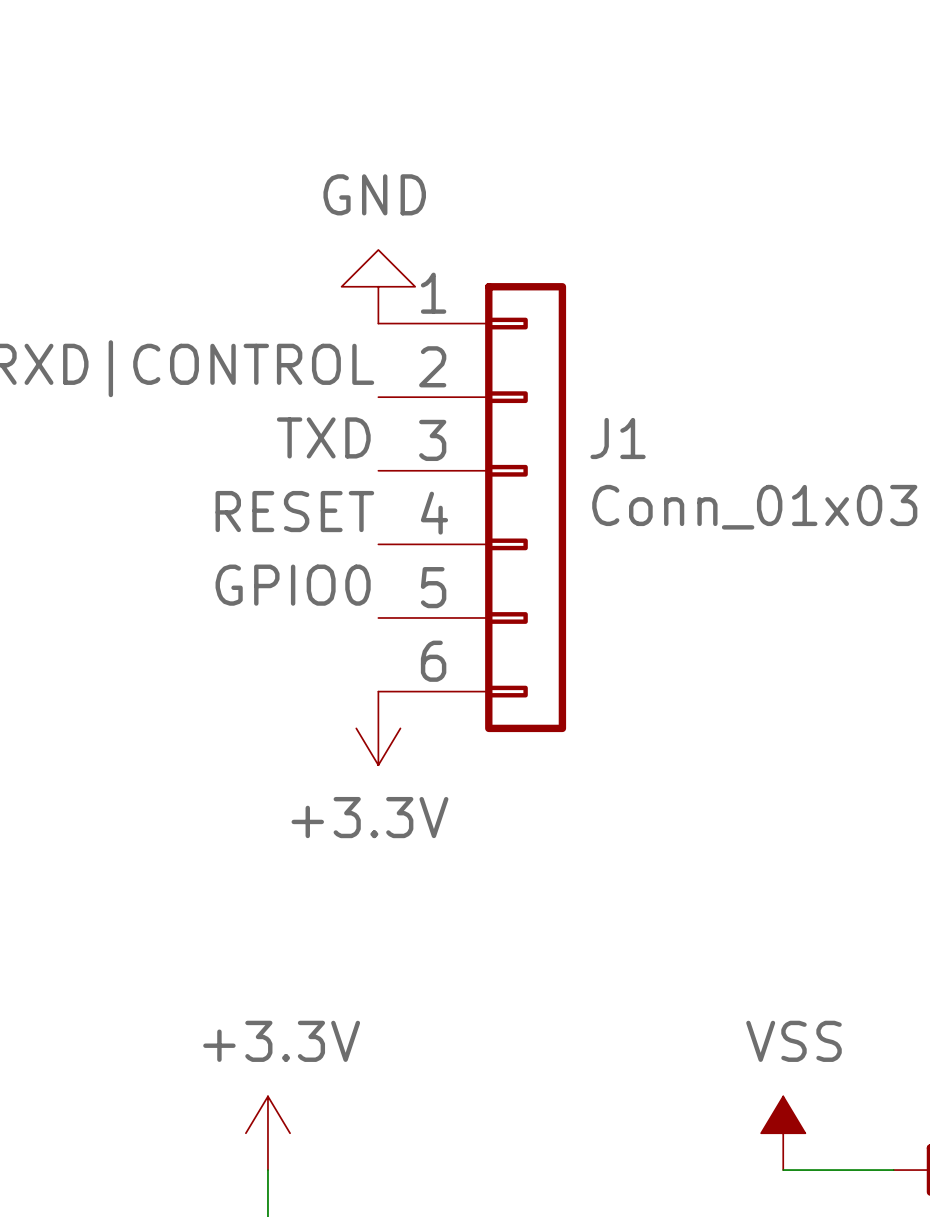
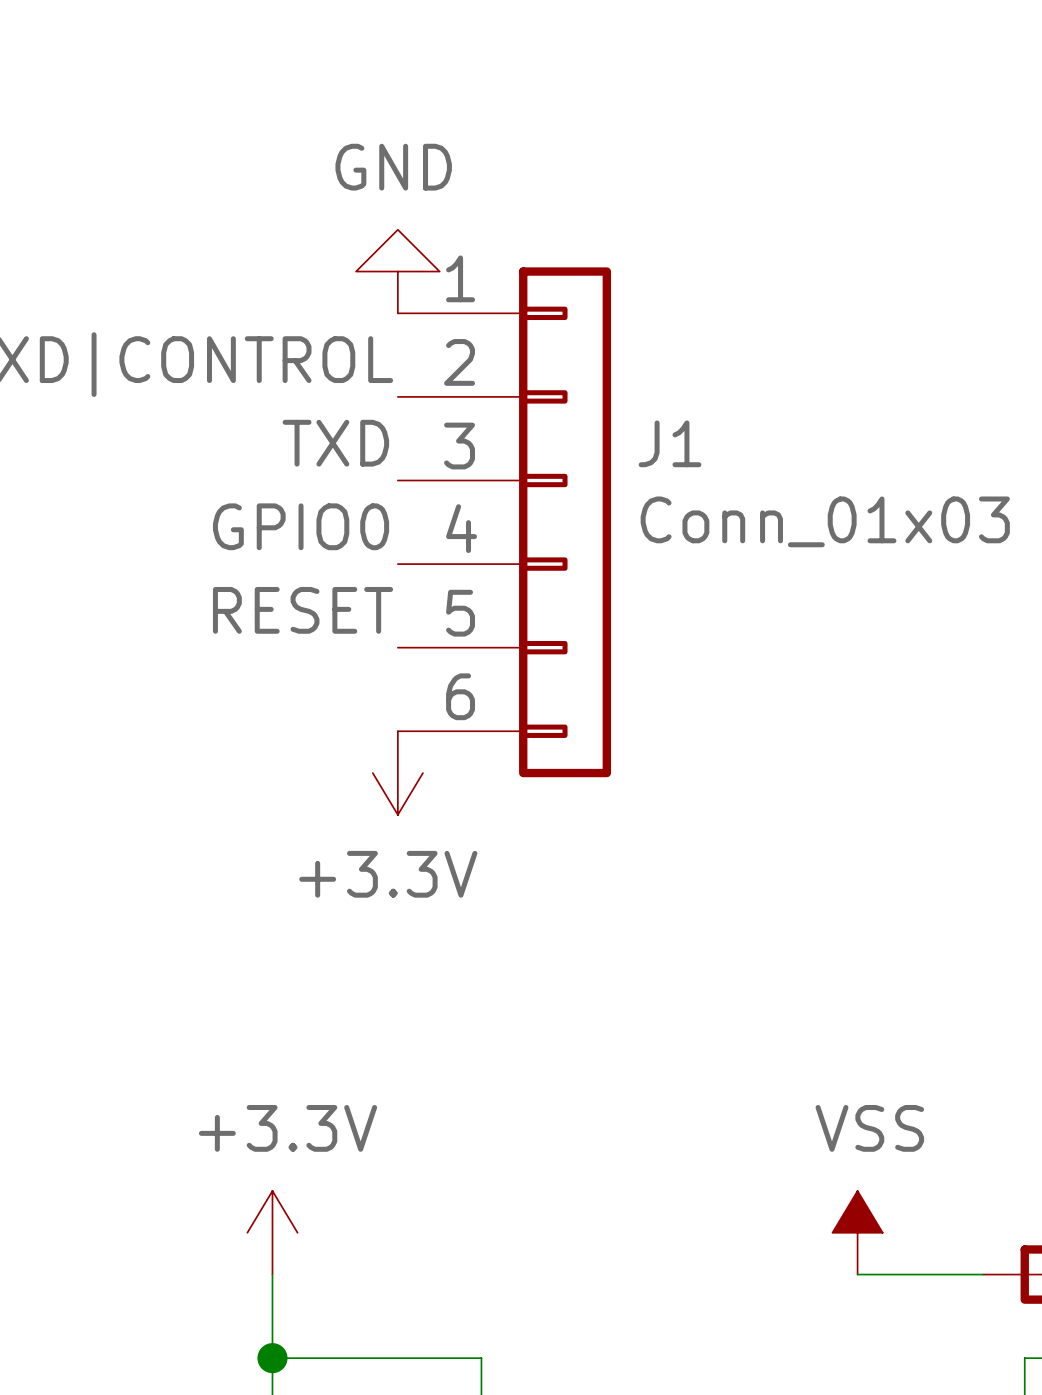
label: RESET (294, 511) -> GPIO0 (301, 526)
label: GPIO0 (293, 585) -> RESET (303, 610)

